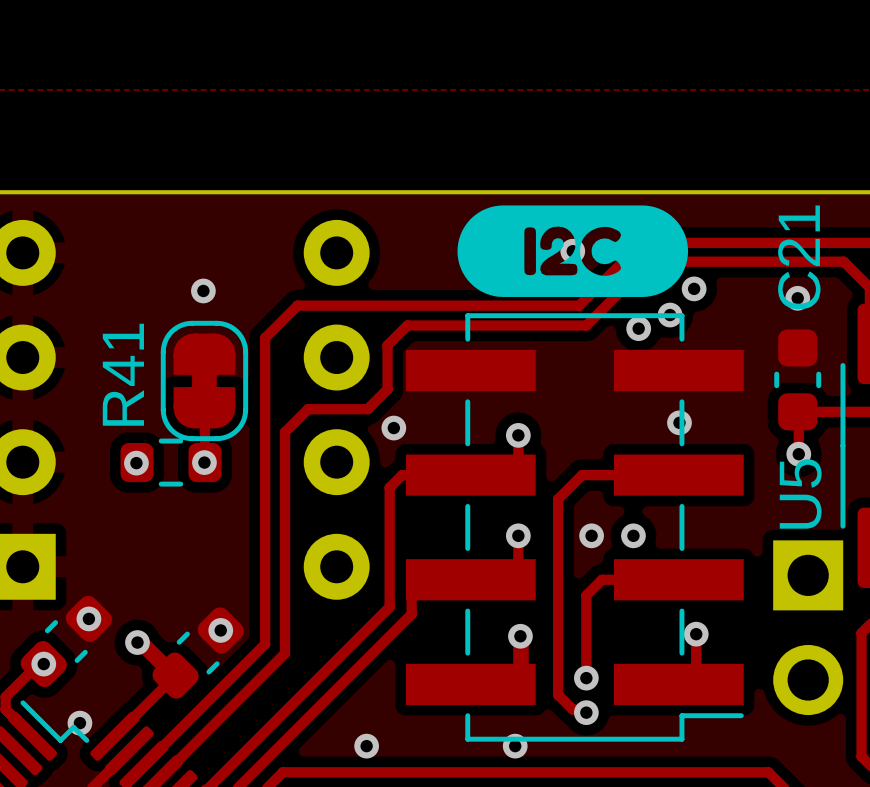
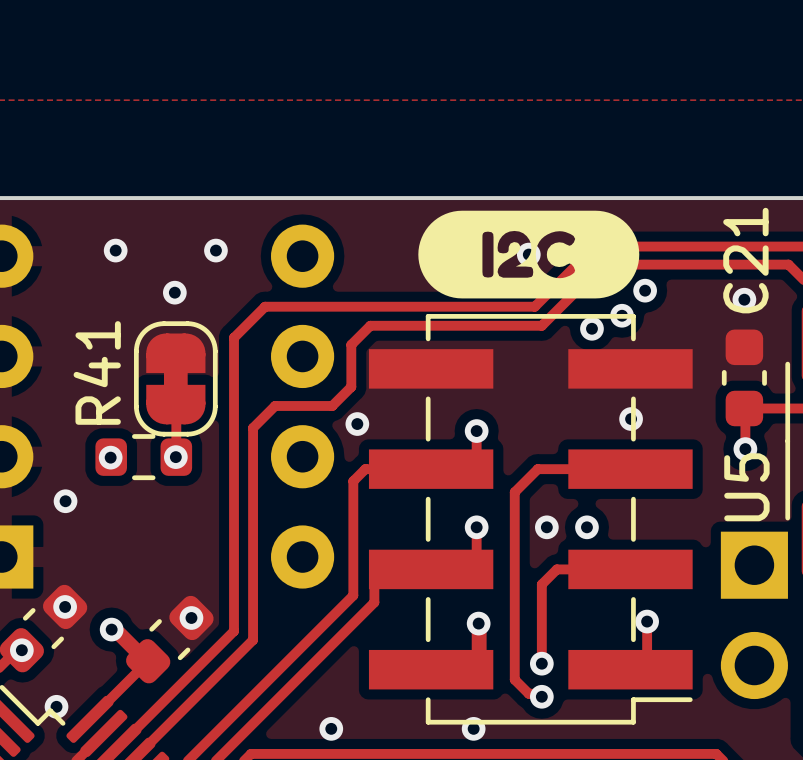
via: none -> (115, 250)
via: none -> (215, 250)
via: none -> (65, 501)

